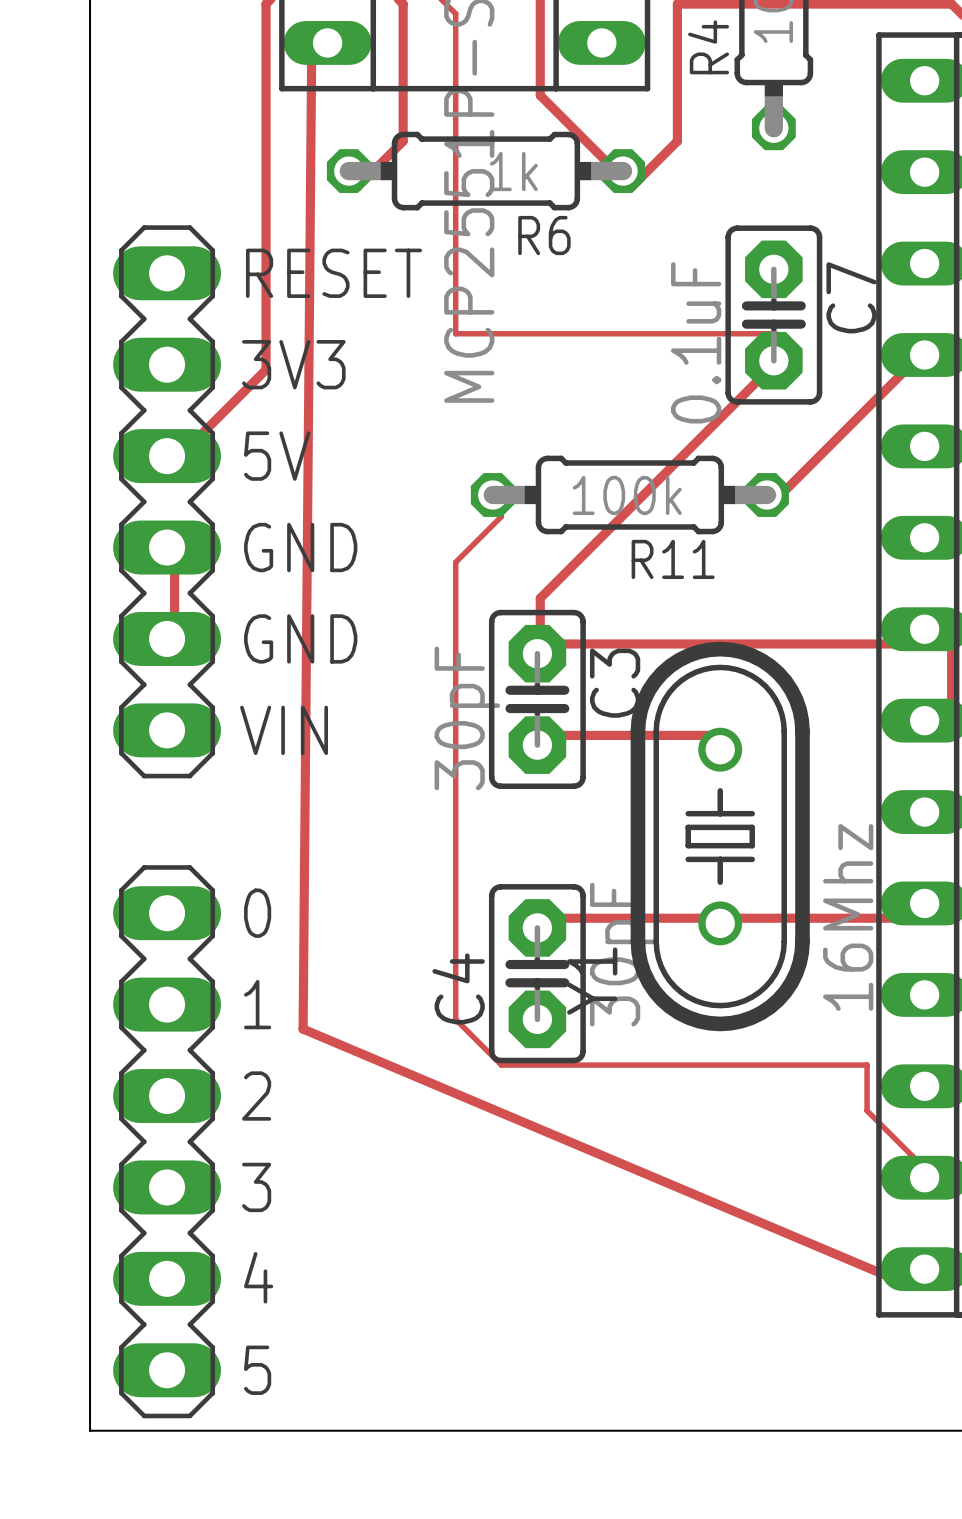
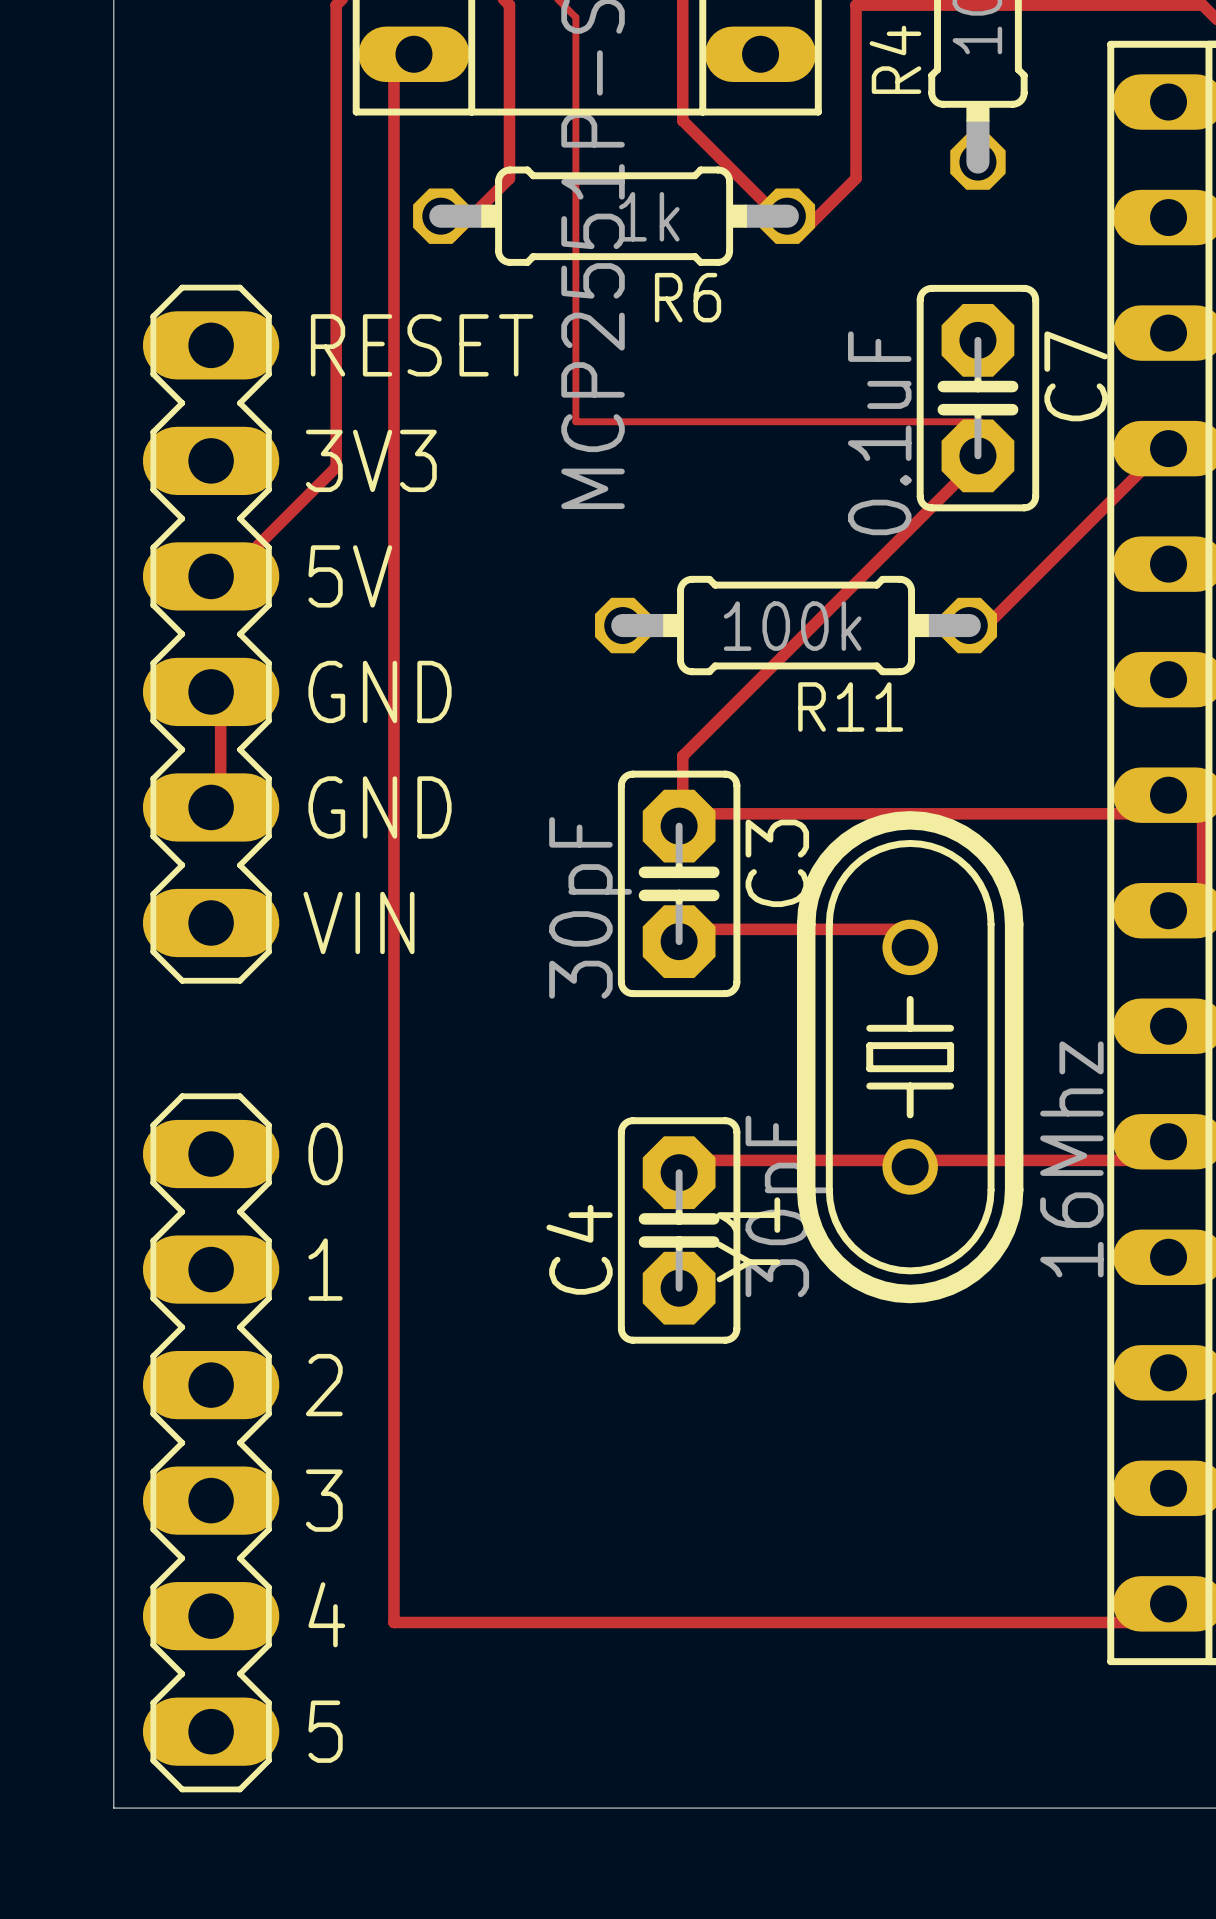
track: (311, 49) (303, 1029) (905, 1283) -> (393, 62) (393, 1622) (1144, 1622)
track: (492, 494) (501, 516) (455, 562) (455, 1019) (501, 1065) (867, 1065) (867, 1110) (912, 1156) (924, 1177) -> none

